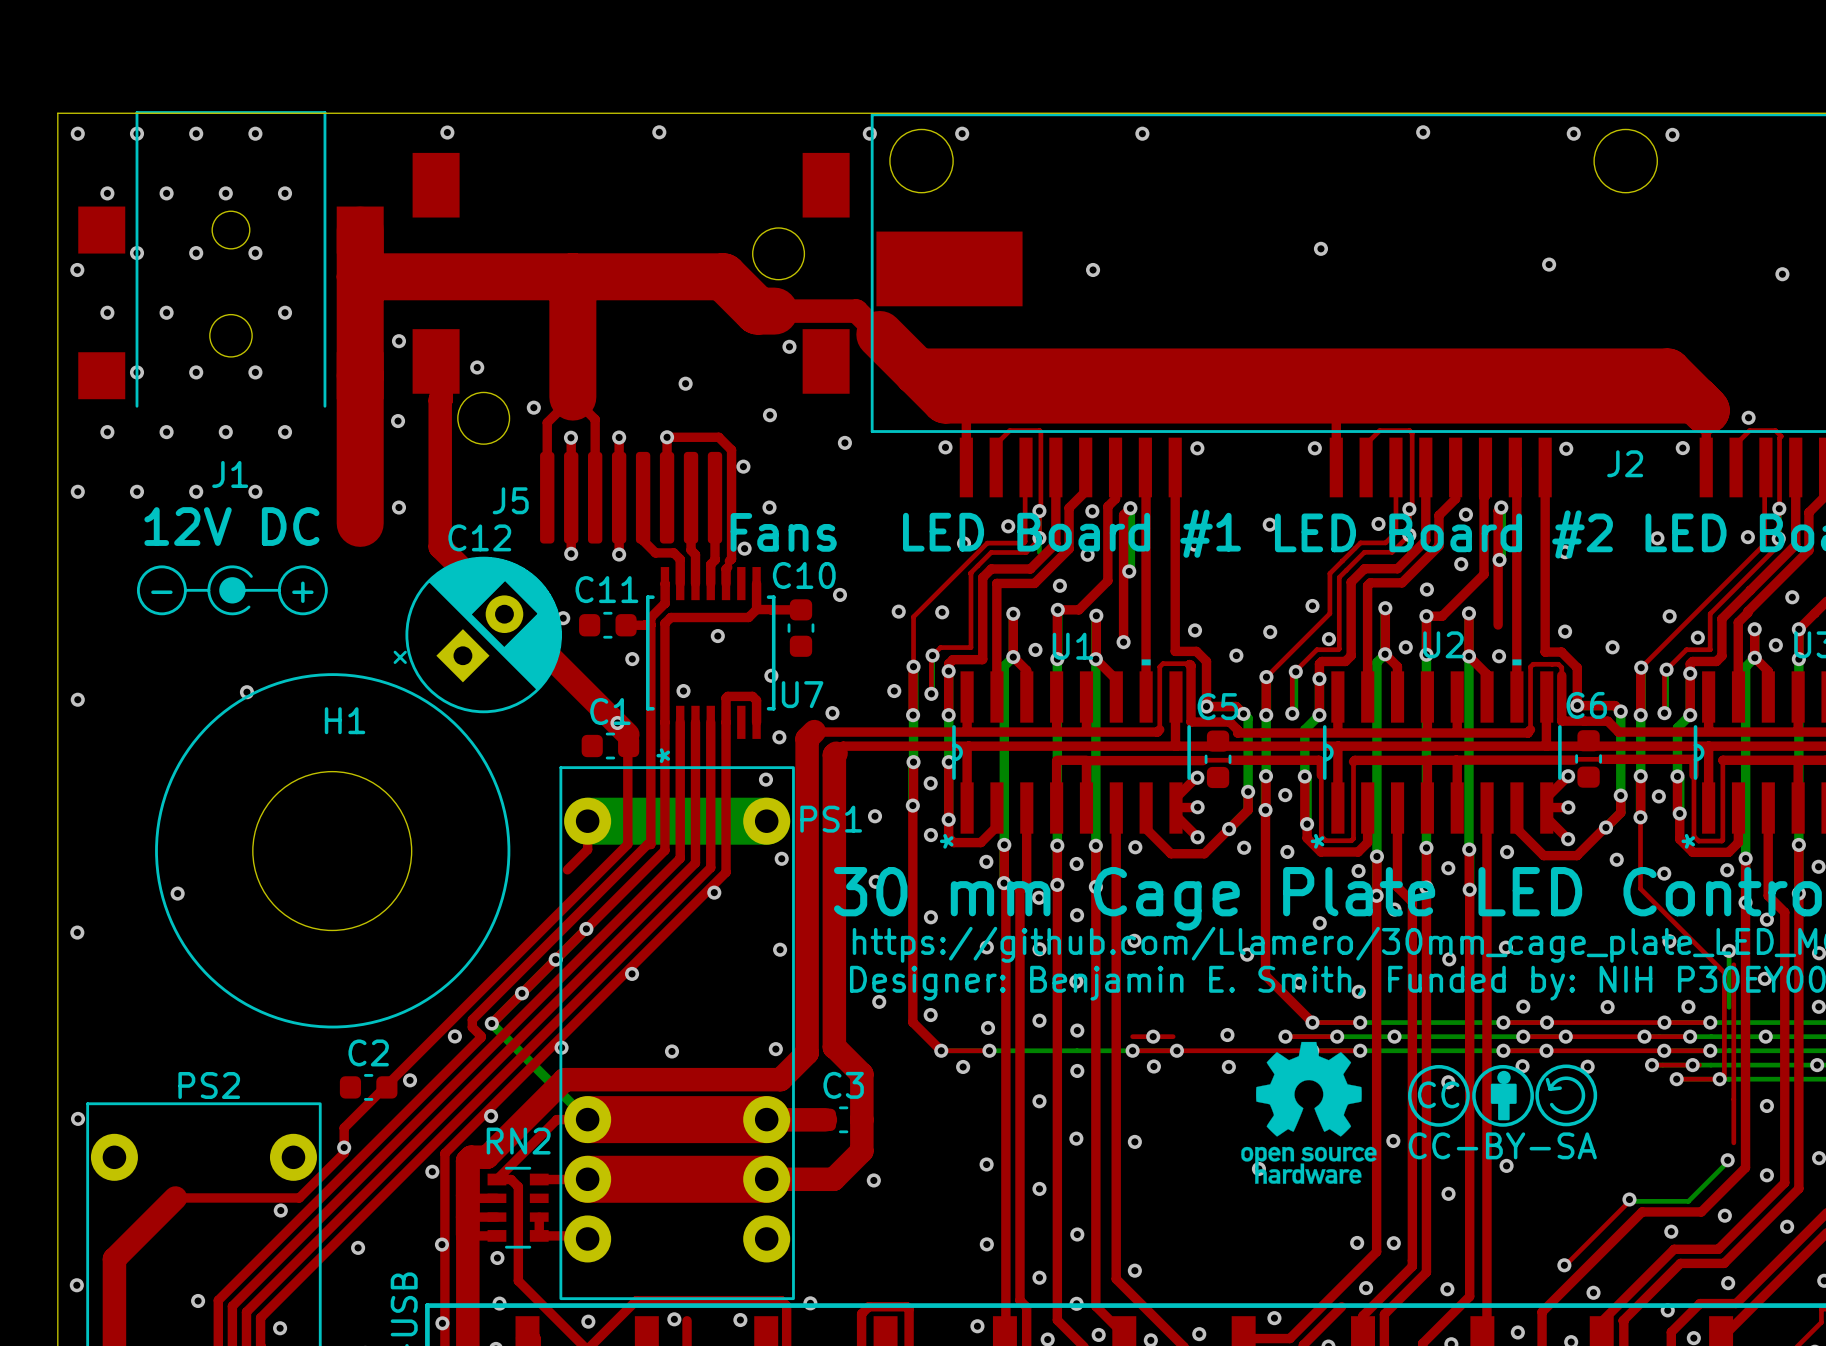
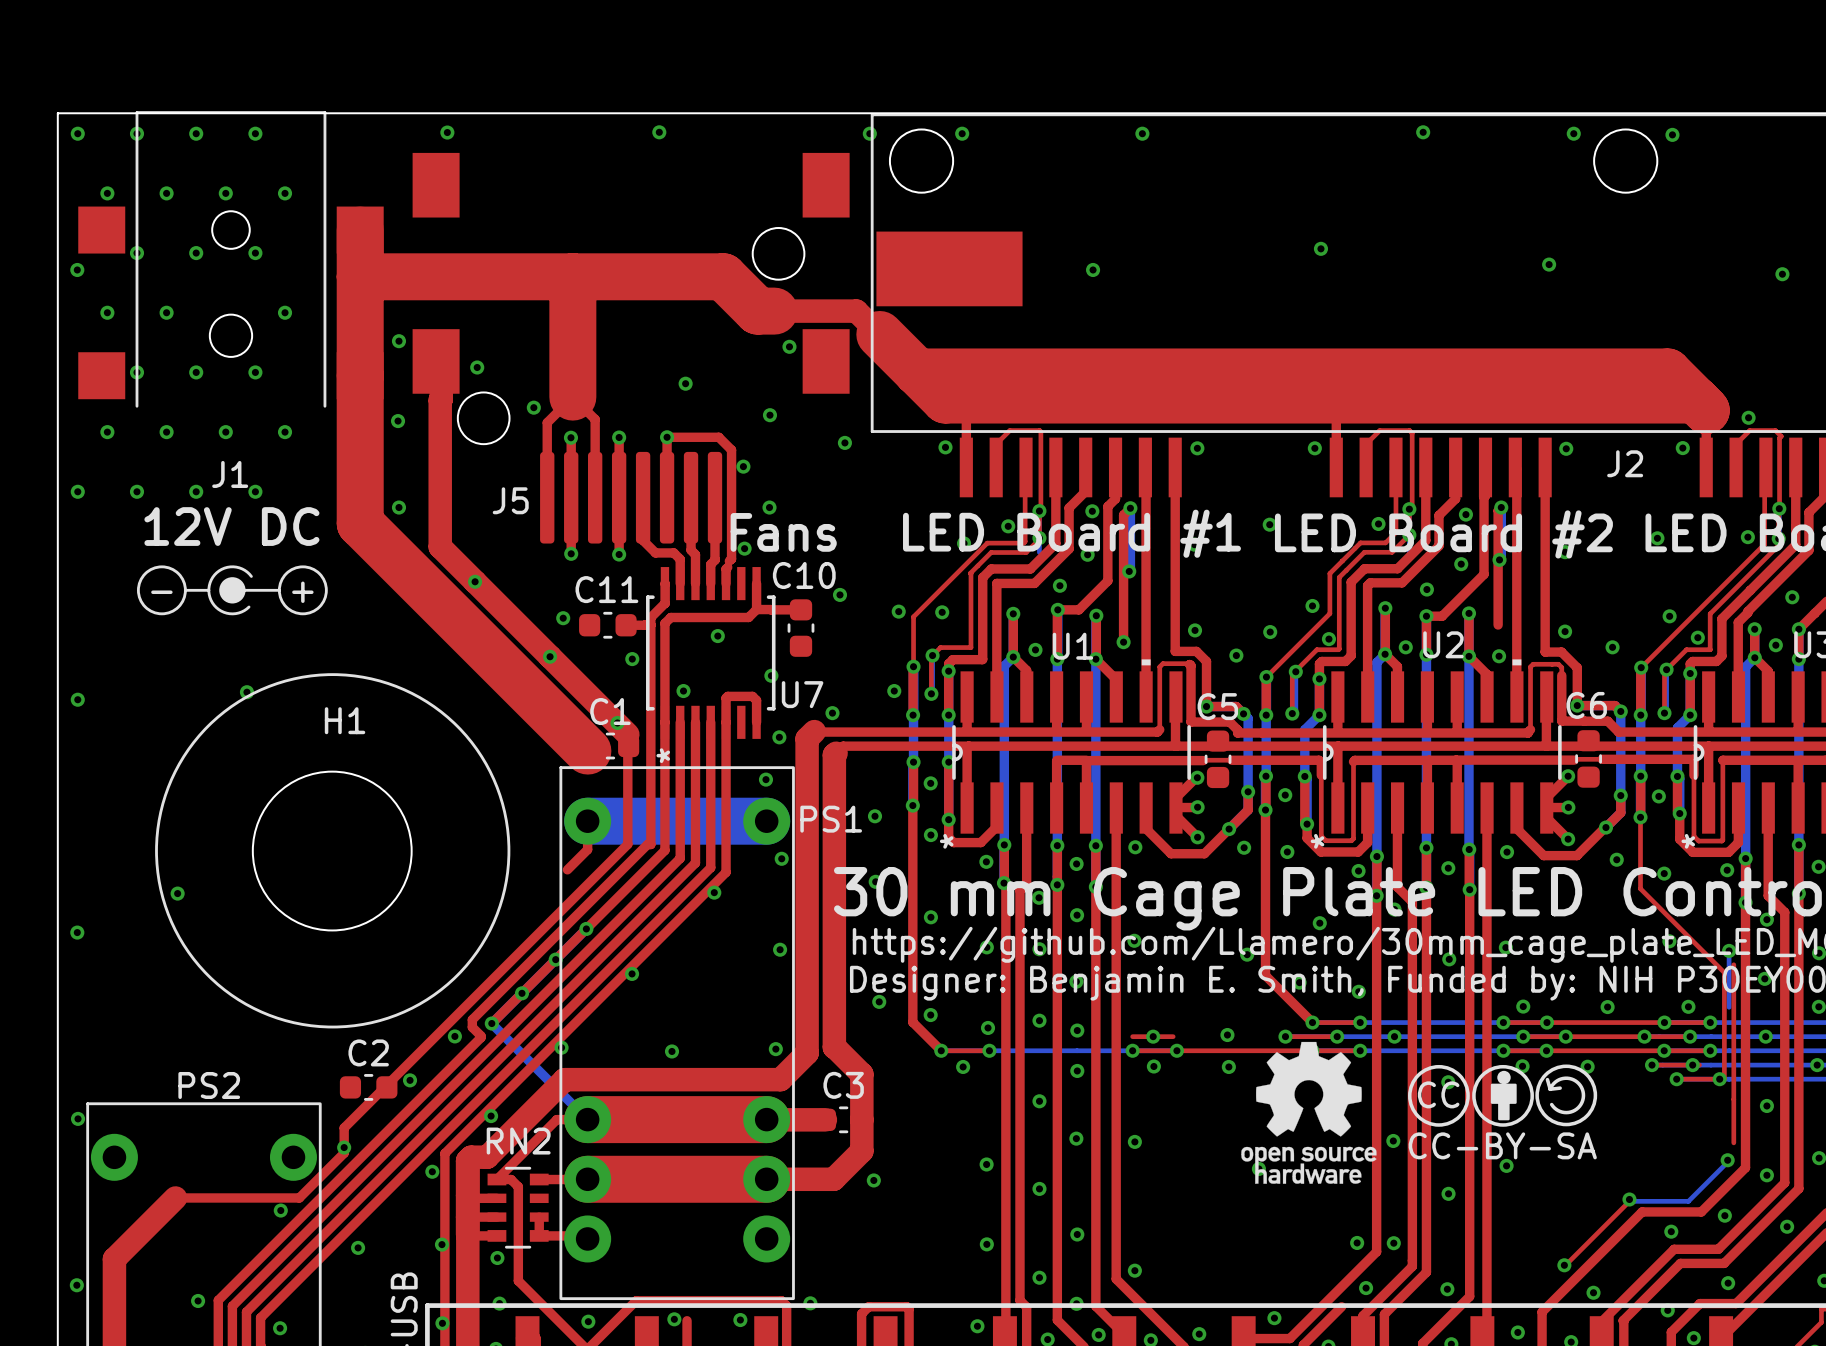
top track: none -> (360, 523) (587, 751)
top track: none -> (475, 581) (550, 656)
C12: (477, 634) -> none

